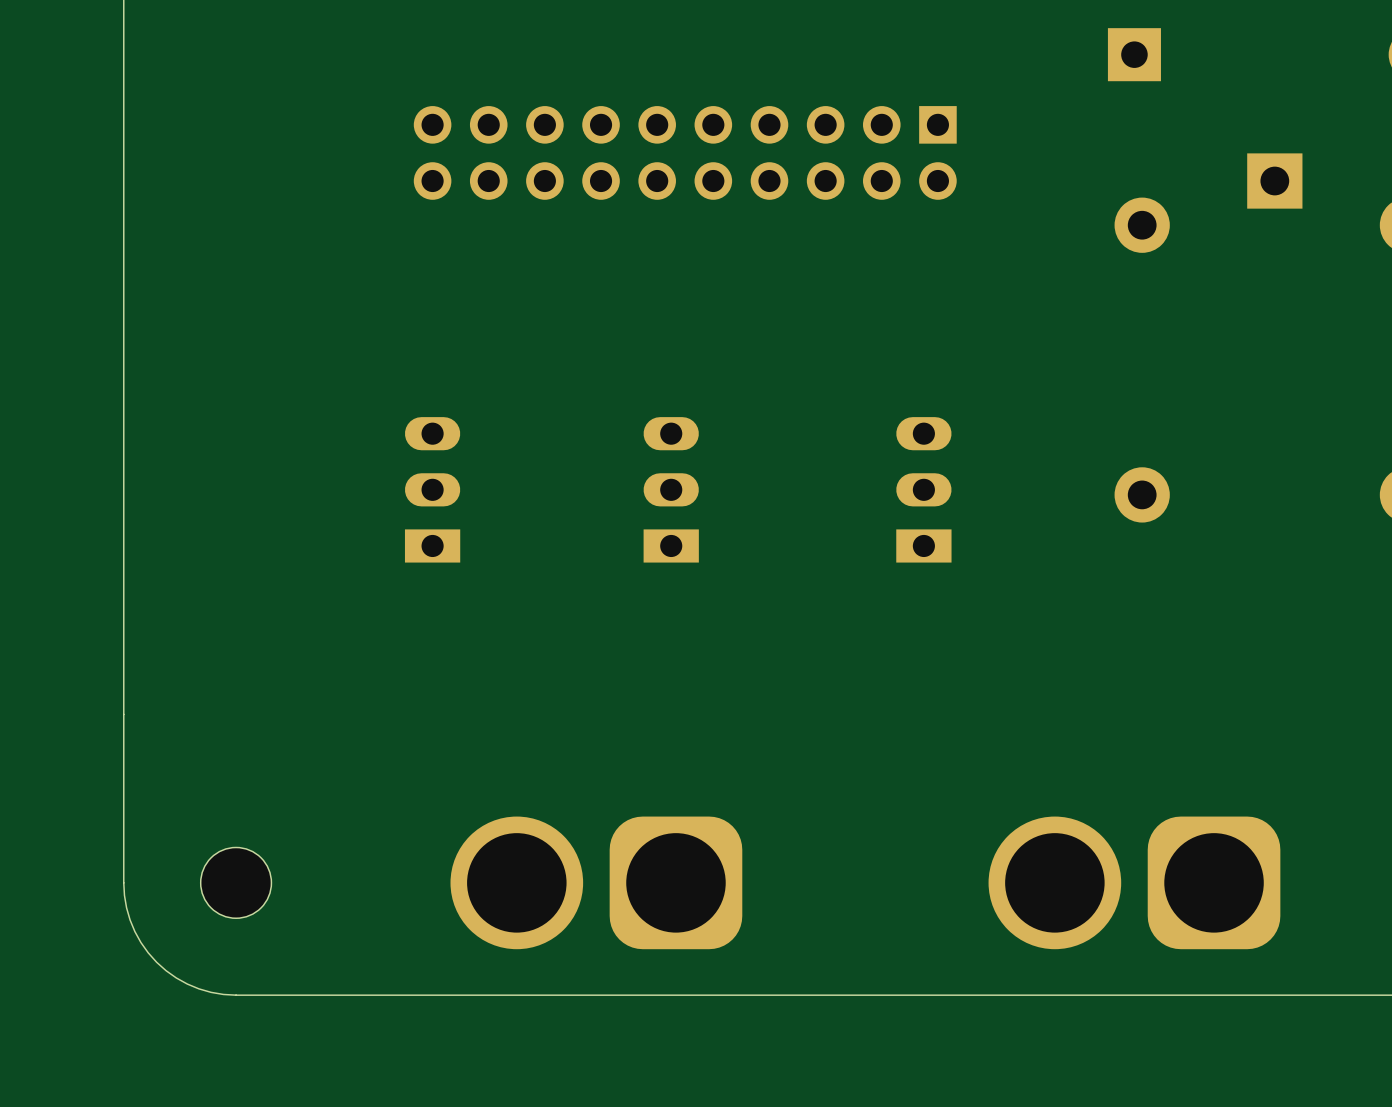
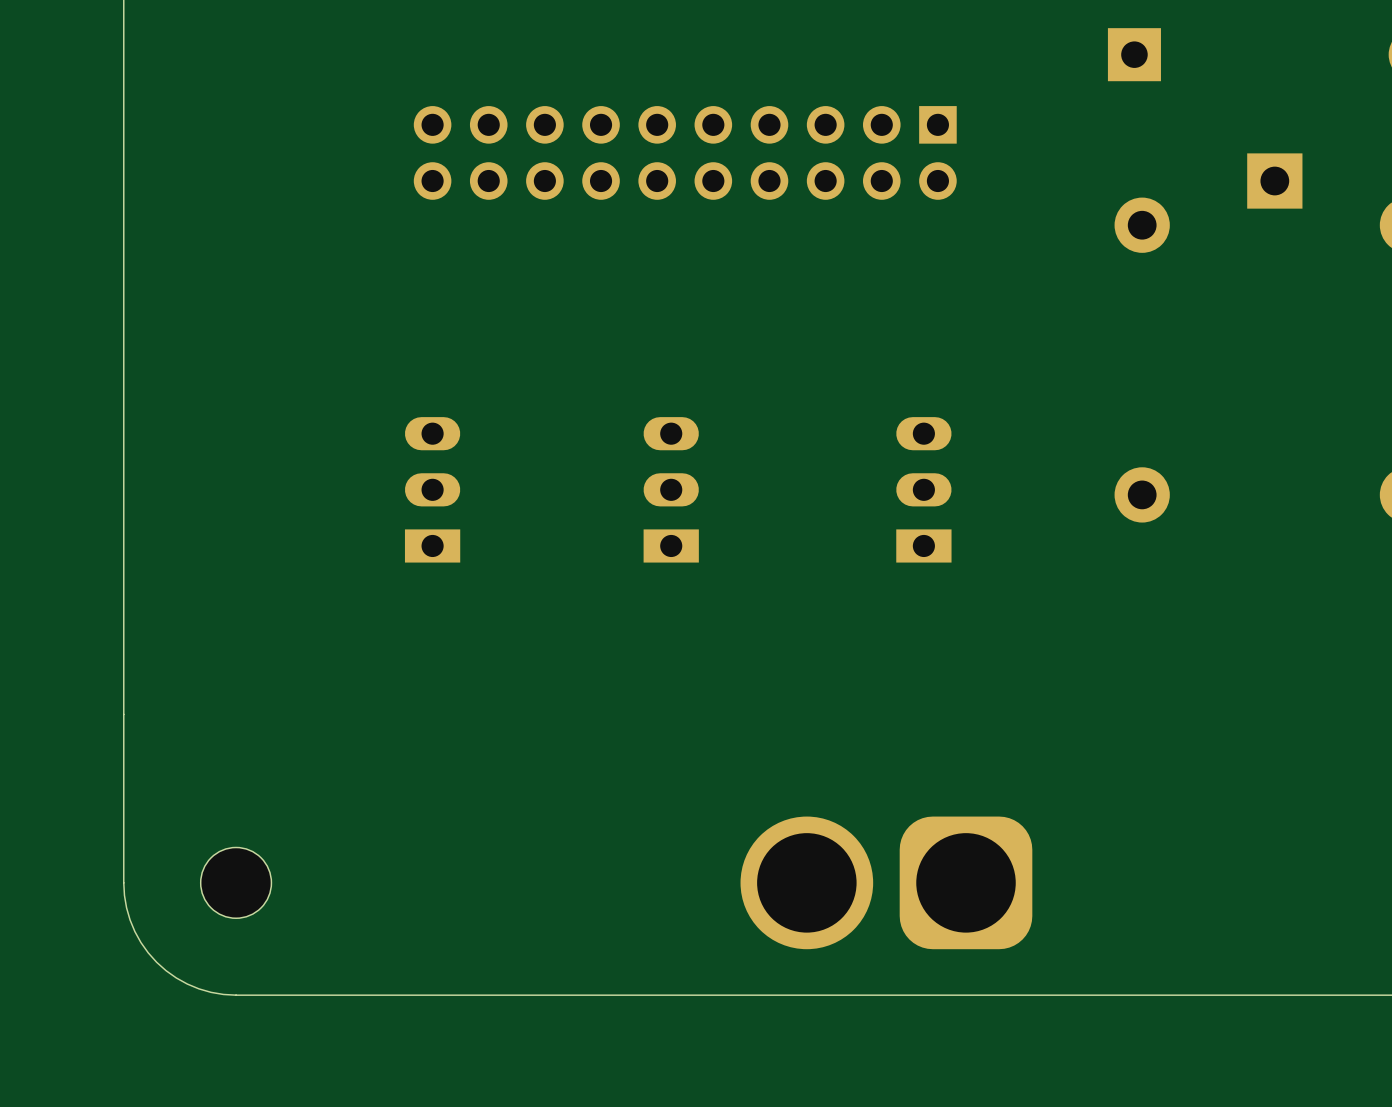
part: (596, 882) -> none
part: none -> (886, 882)
part: (1134, 882) -> none

